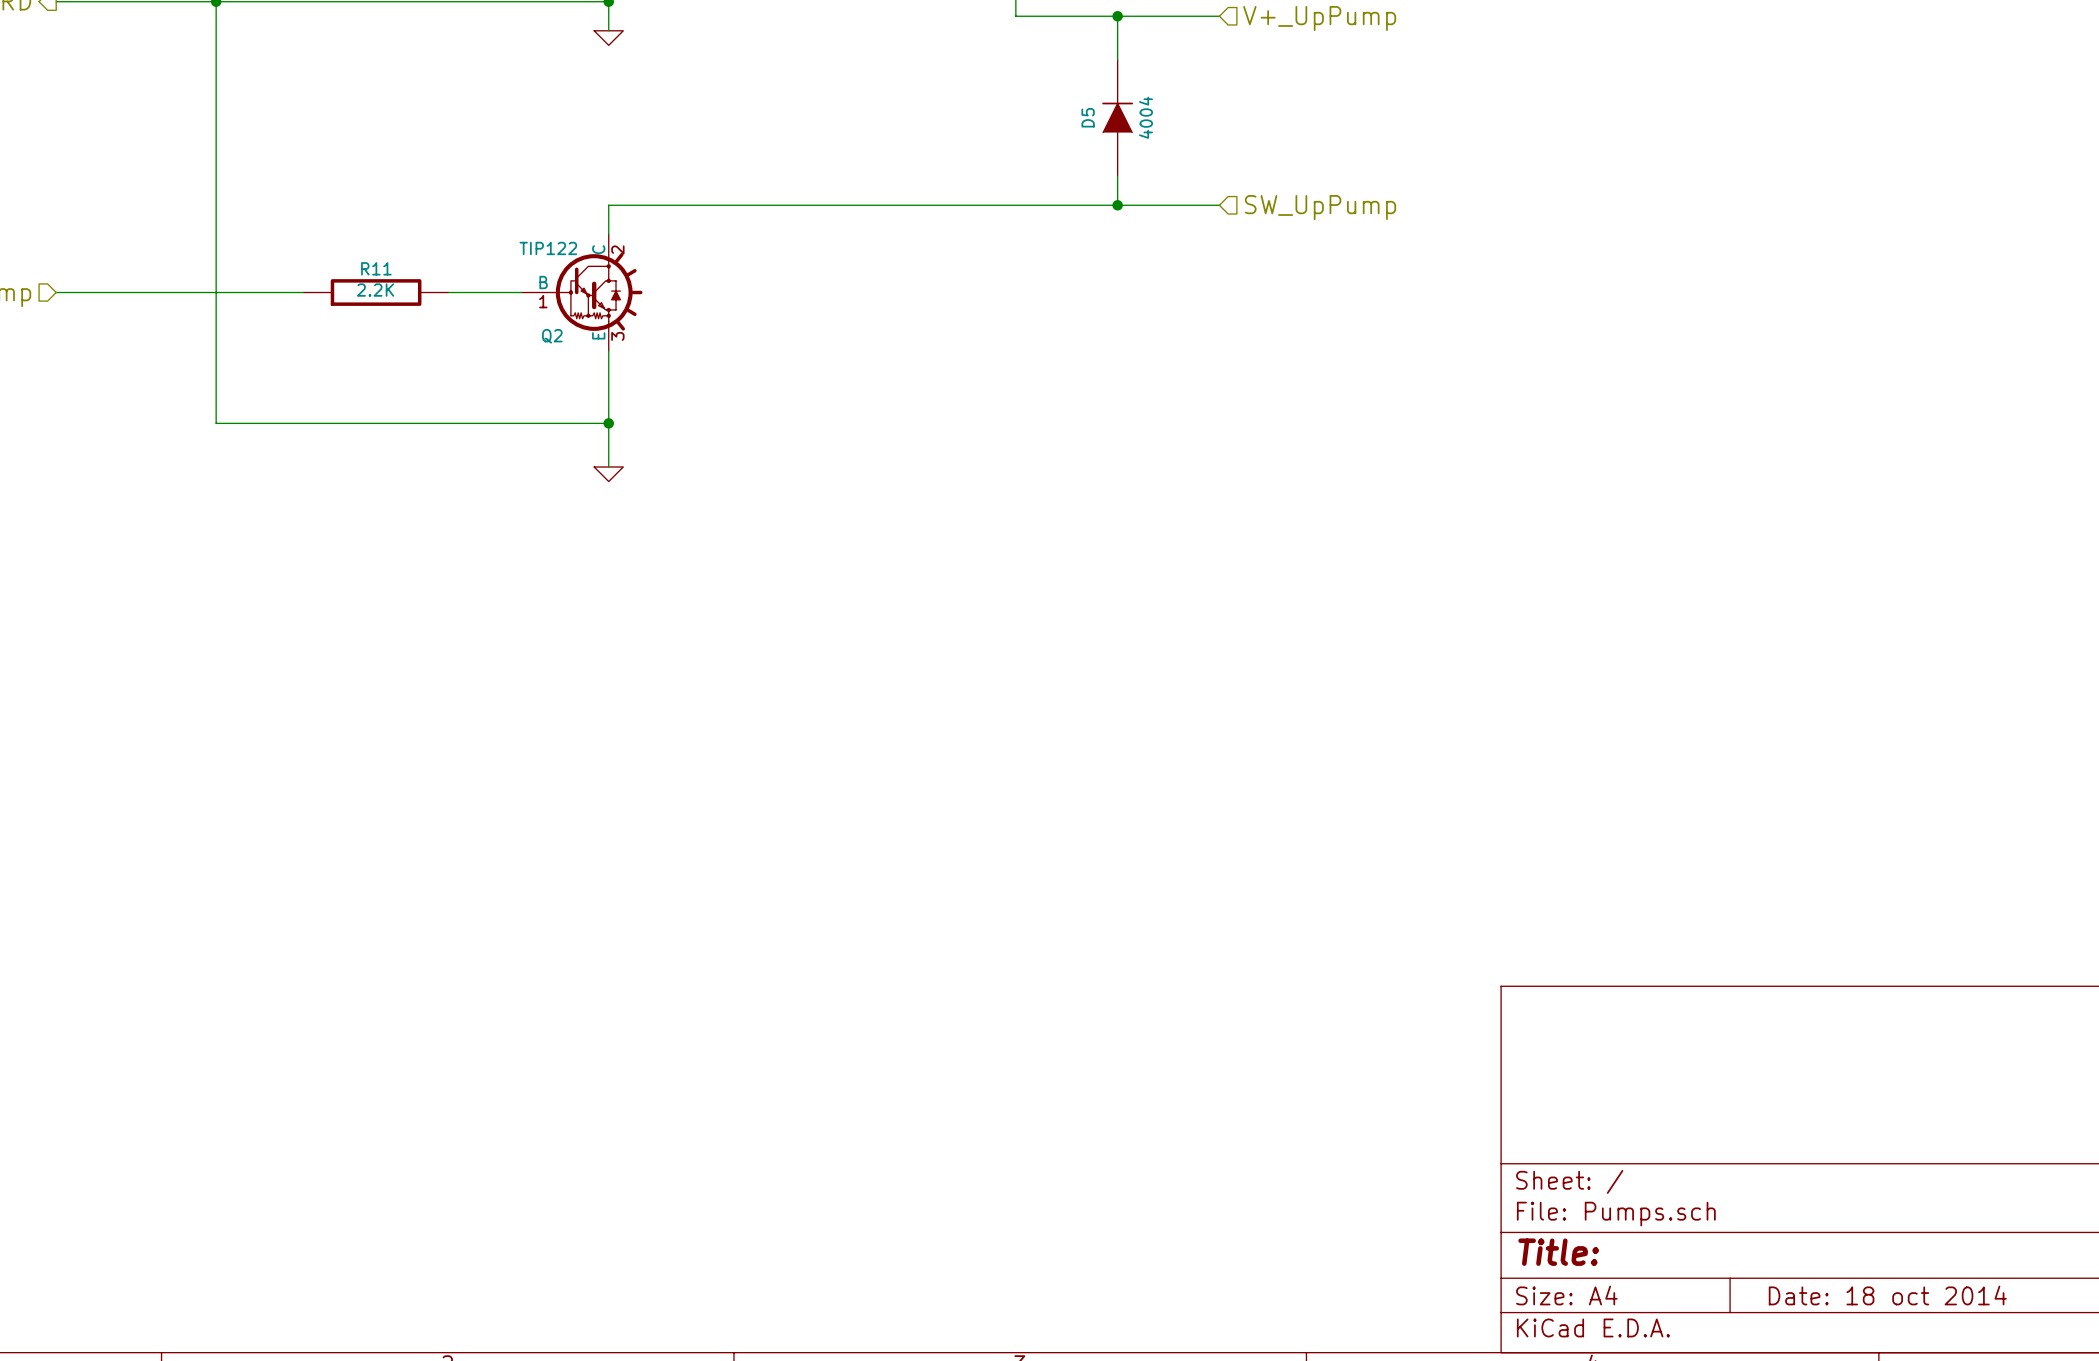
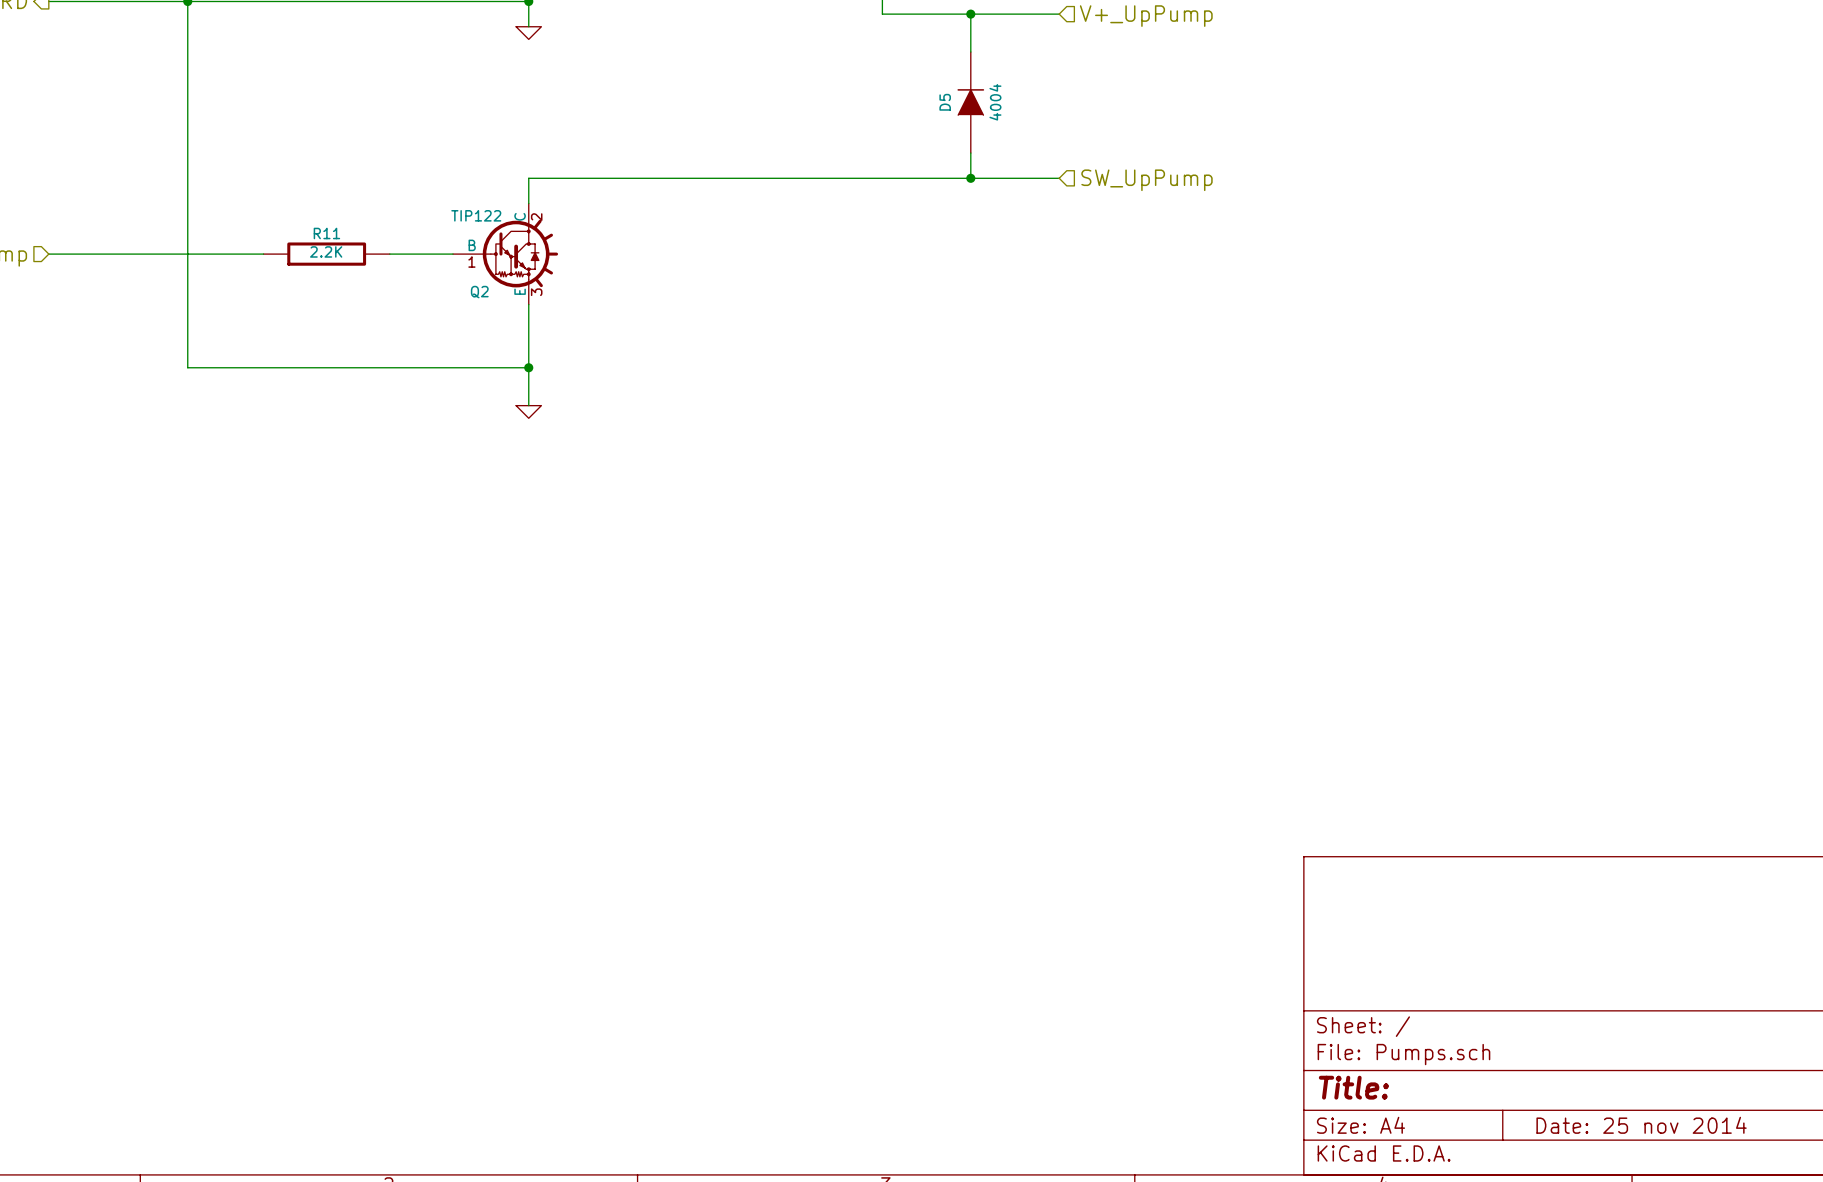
title block: Date: 18 oct 2014 (1887, 1295) -> Date: 25 nov 2014 (1641, 1125)

